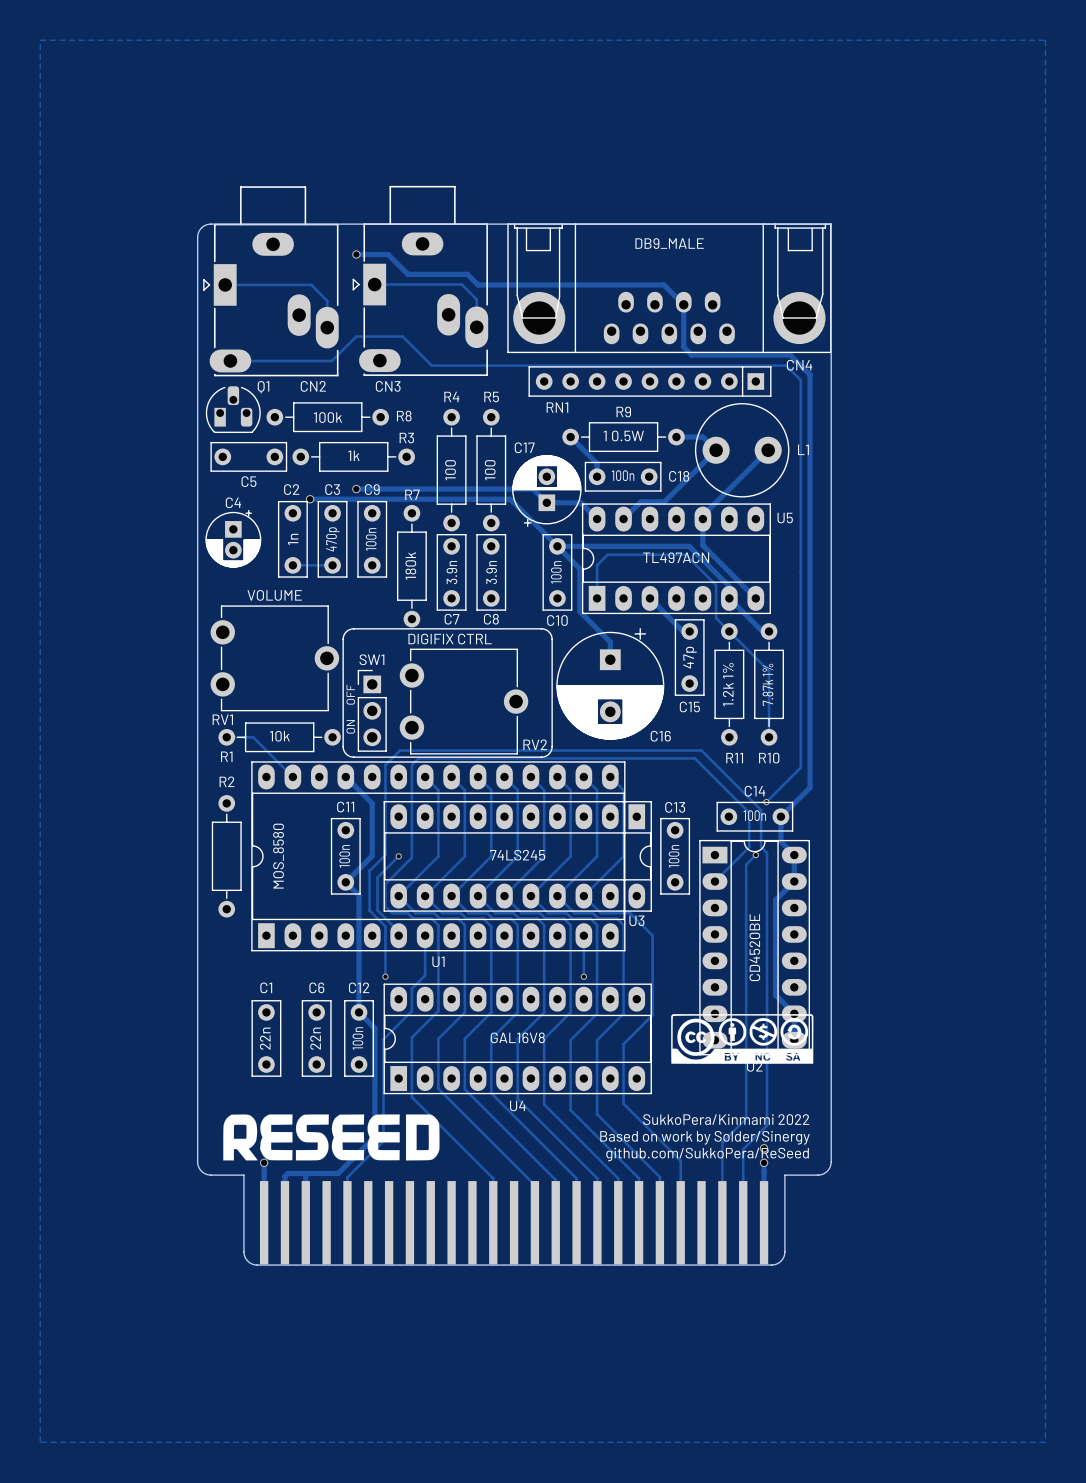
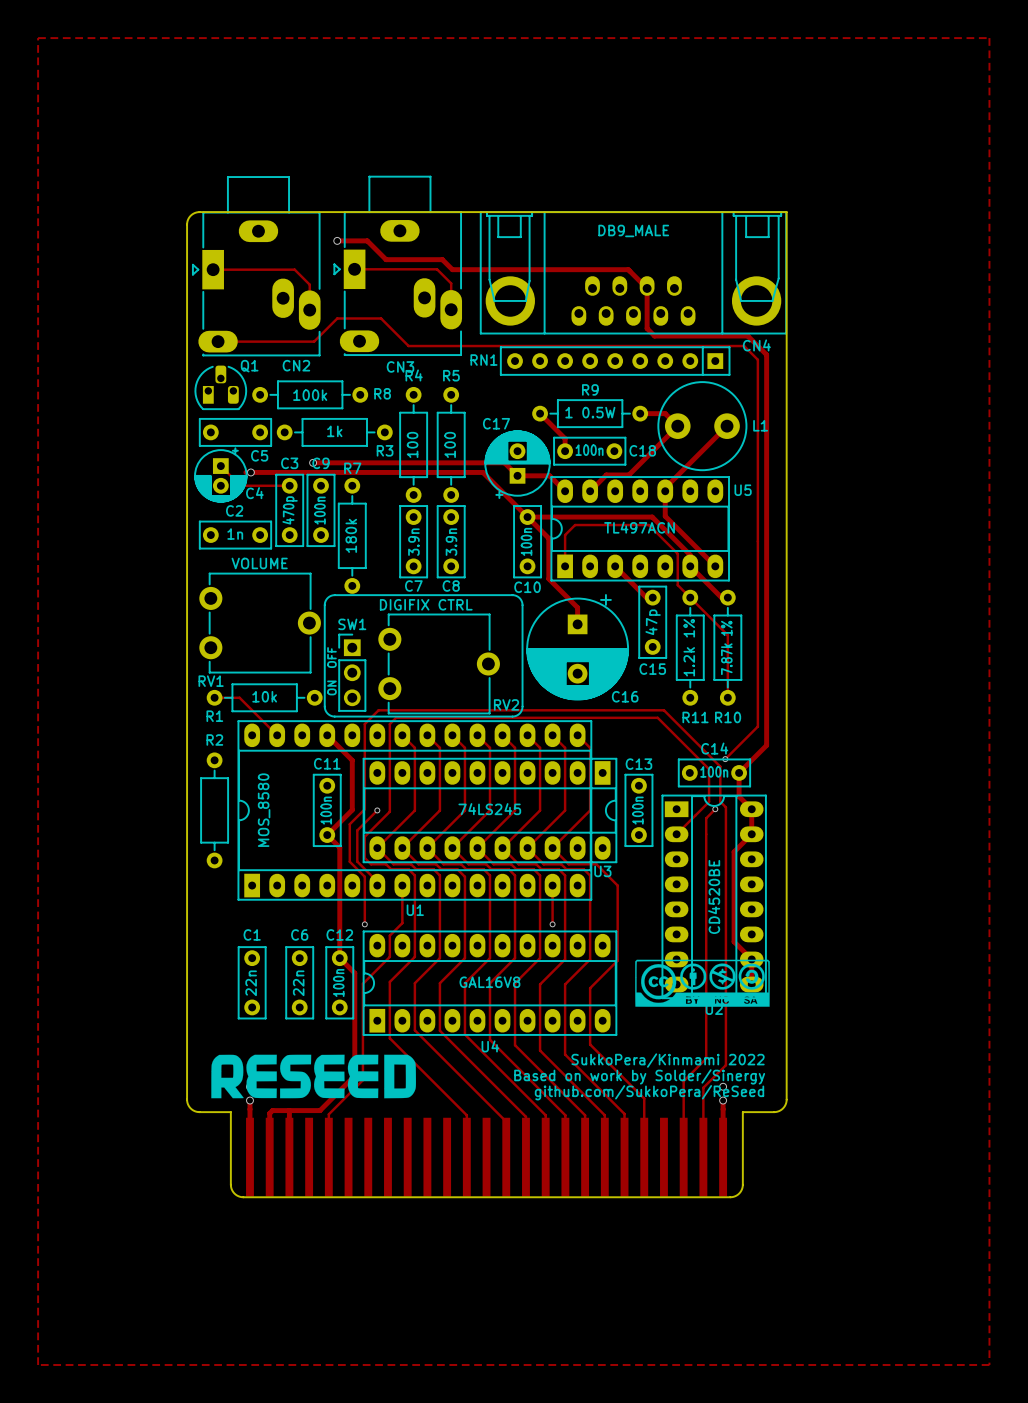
CN3 name position: CN3 (388, 386) -> CN3 (400, 366)
RN1 name position: RN1 (557, 407) -> RN1 (483, 360)
R3 name position: R3 (406, 438) -> R3 (385, 450)
R4 position: (451, 470) -> (413, 444)
R5 position: (491, 470) -> (451, 444)
C5 name position: C5 (248, 481) -> C5 (259, 455)
C2 name position: C2 (291, 489) -> C2 (234, 510)
track: none -> (313, 462) (336, 462)
via: none -> (313, 462)
via: (356, 489) -> none
track: none -> (220, 466) (240, 485) (289, 485)
track: none -> (245, 472) (293, 472)
via: none -> (250, 472)
via: (310, 499) -> none
C4 name position: C4 (233, 502) -> C4 (254, 493)
C4 position: (233, 538) -> (220, 475)
C2 rotation: 0° (292, 539) -> 90° clockwise (235, 535)
C2 position: (292, 539) -> (235, 535)
C3 position: (332, 539) -> (289, 510)
C9 position: (372, 539) -> (321, 510)
track: (292, 565) (332, 565) -> none
R7 position: (411, 566) -> (352, 535)
C7 position: (451, 572) -> (413, 541)
C8 position: (491, 572) -> (451, 541)

